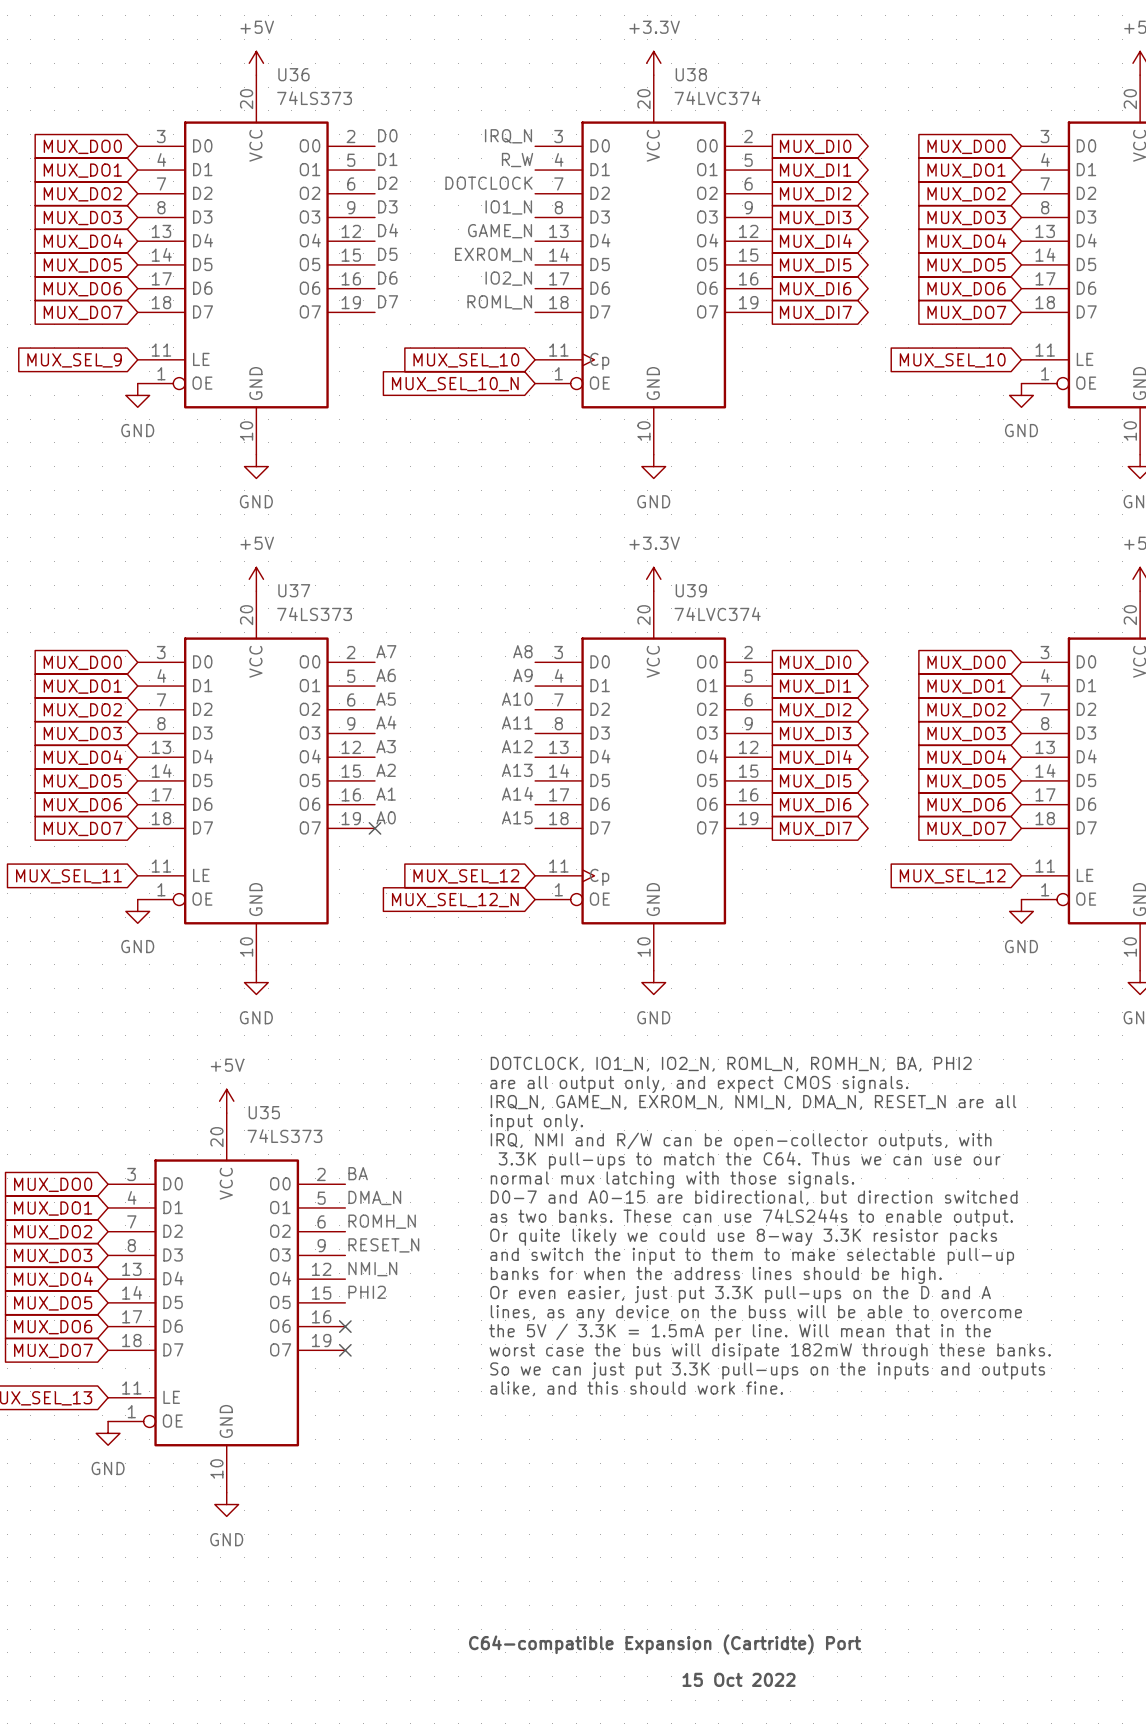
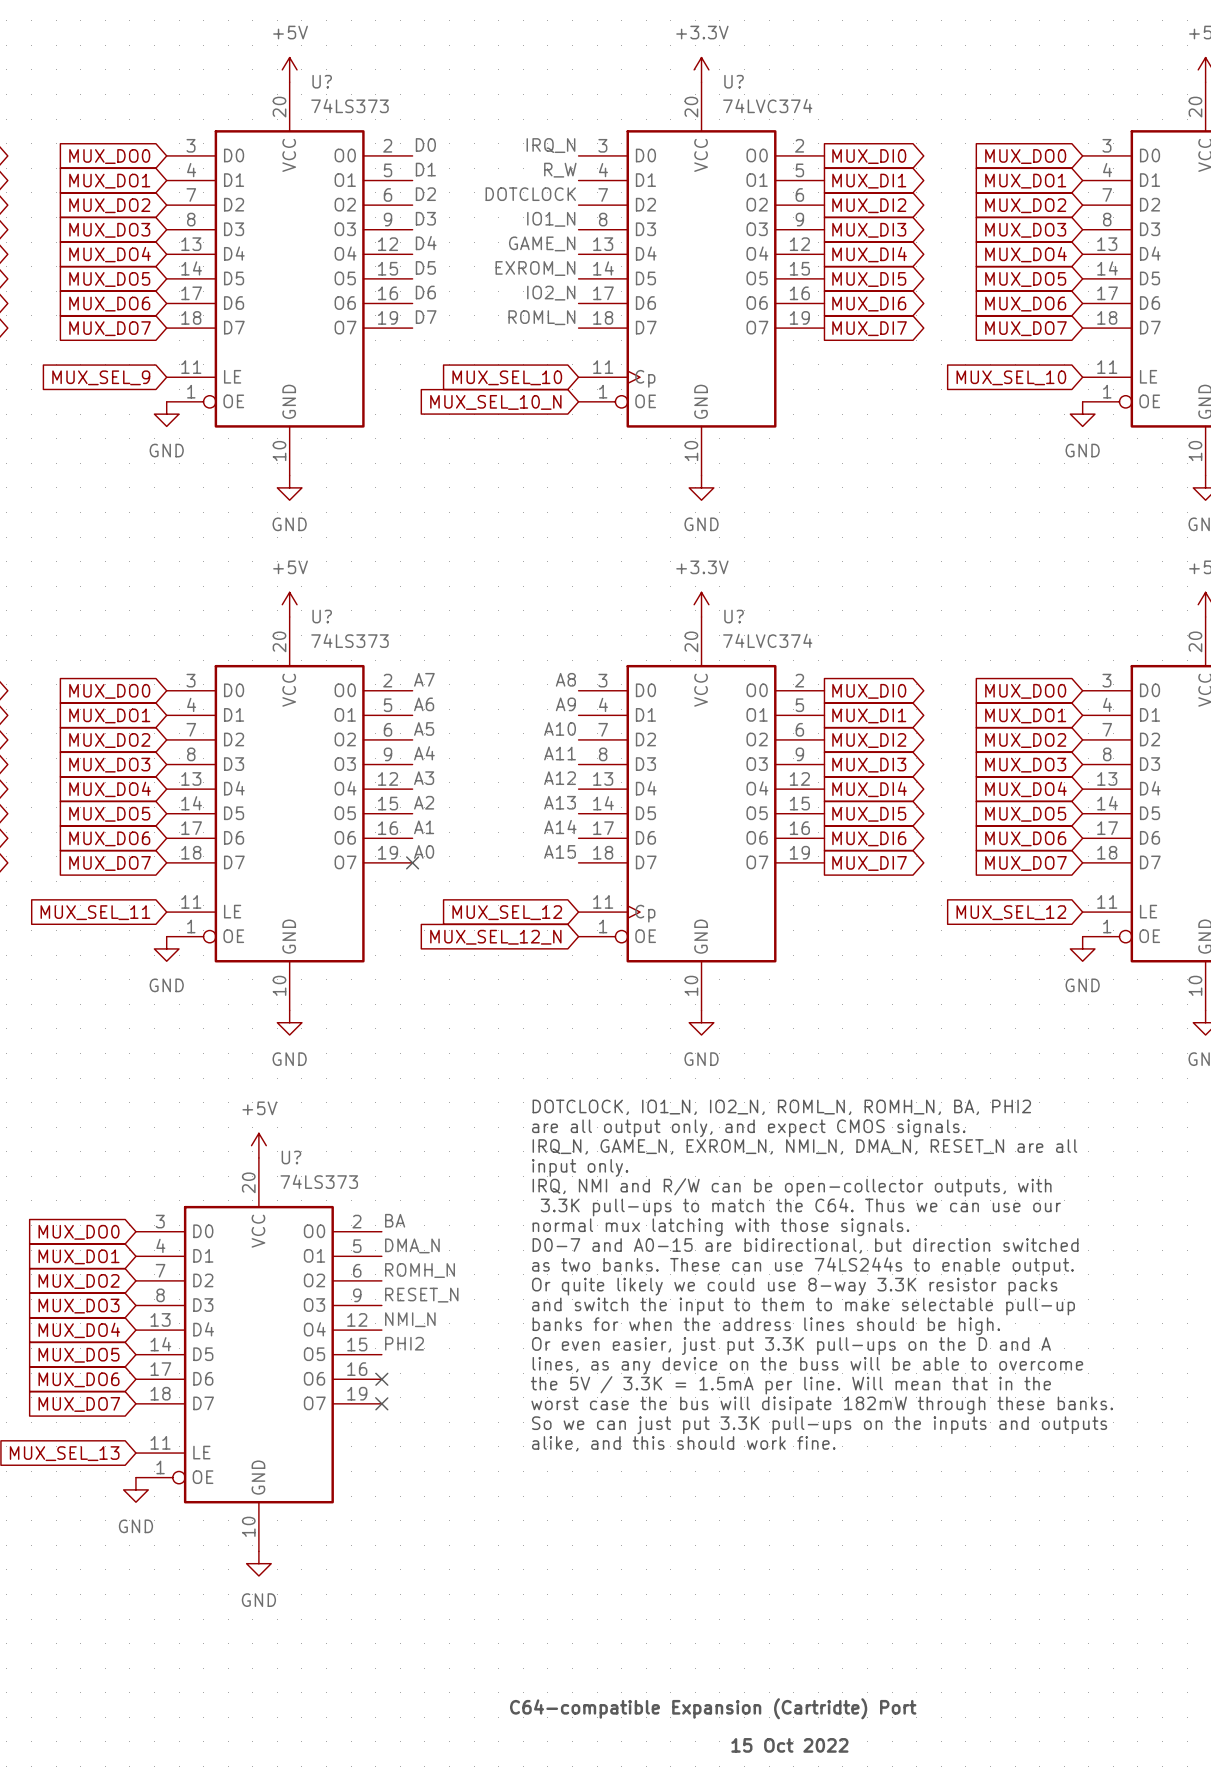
U36 name: U36 (293, 74) -> U? (322, 81)
U38 name: U38 (691, 74) -> U? (734, 81)
U37 name: U37 (294, 590) -> U? (322, 616)
U39 name: U39 (691, 590) -> U? (734, 616)
U35 name: U35 (264, 1112) -> U? (291, 1157)

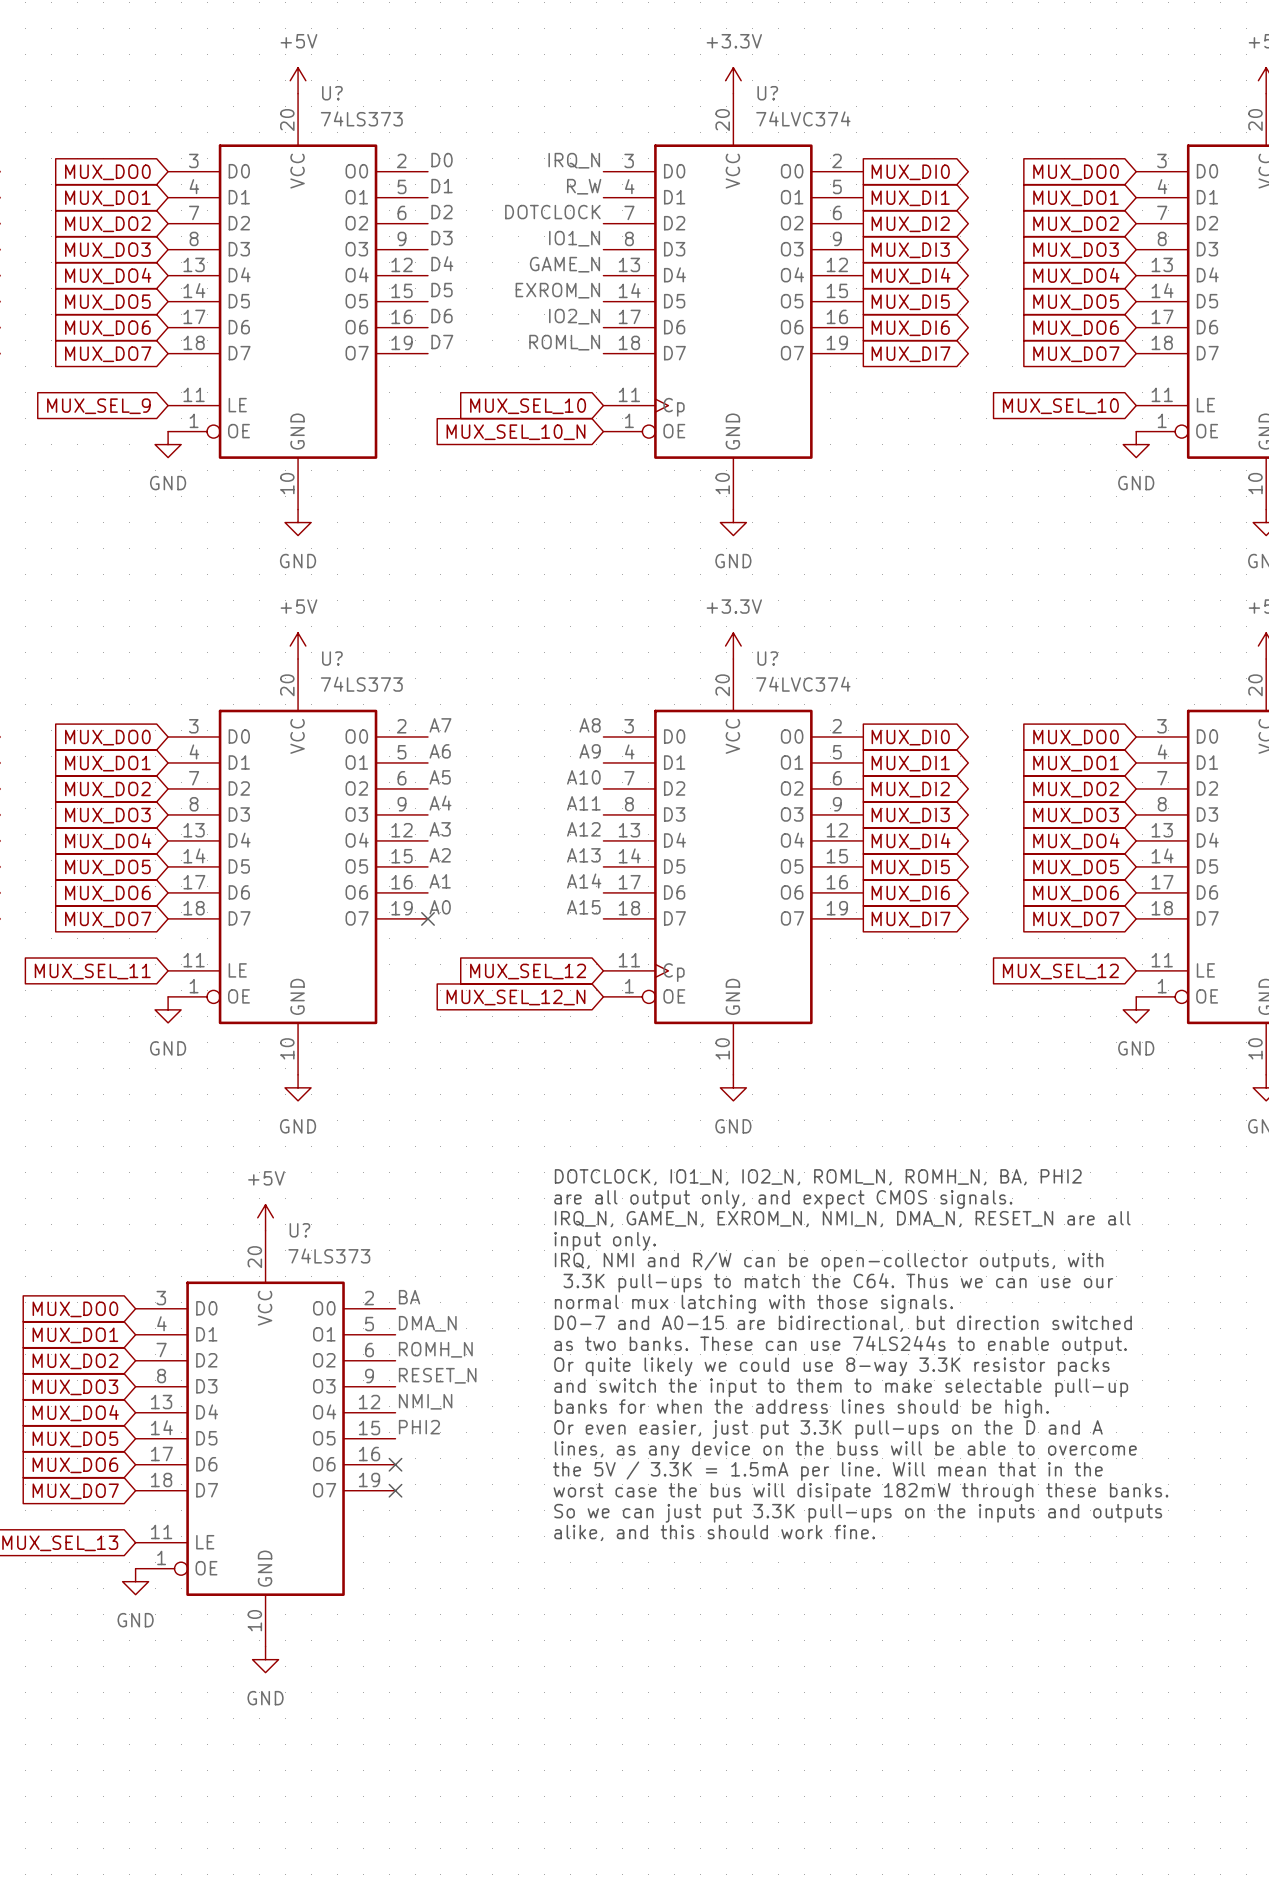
text: C64-compatible Expansion (Cartridte) Port (713, 1708) -> none
text: 15 Oct 2022 (789, 1745) -> none

